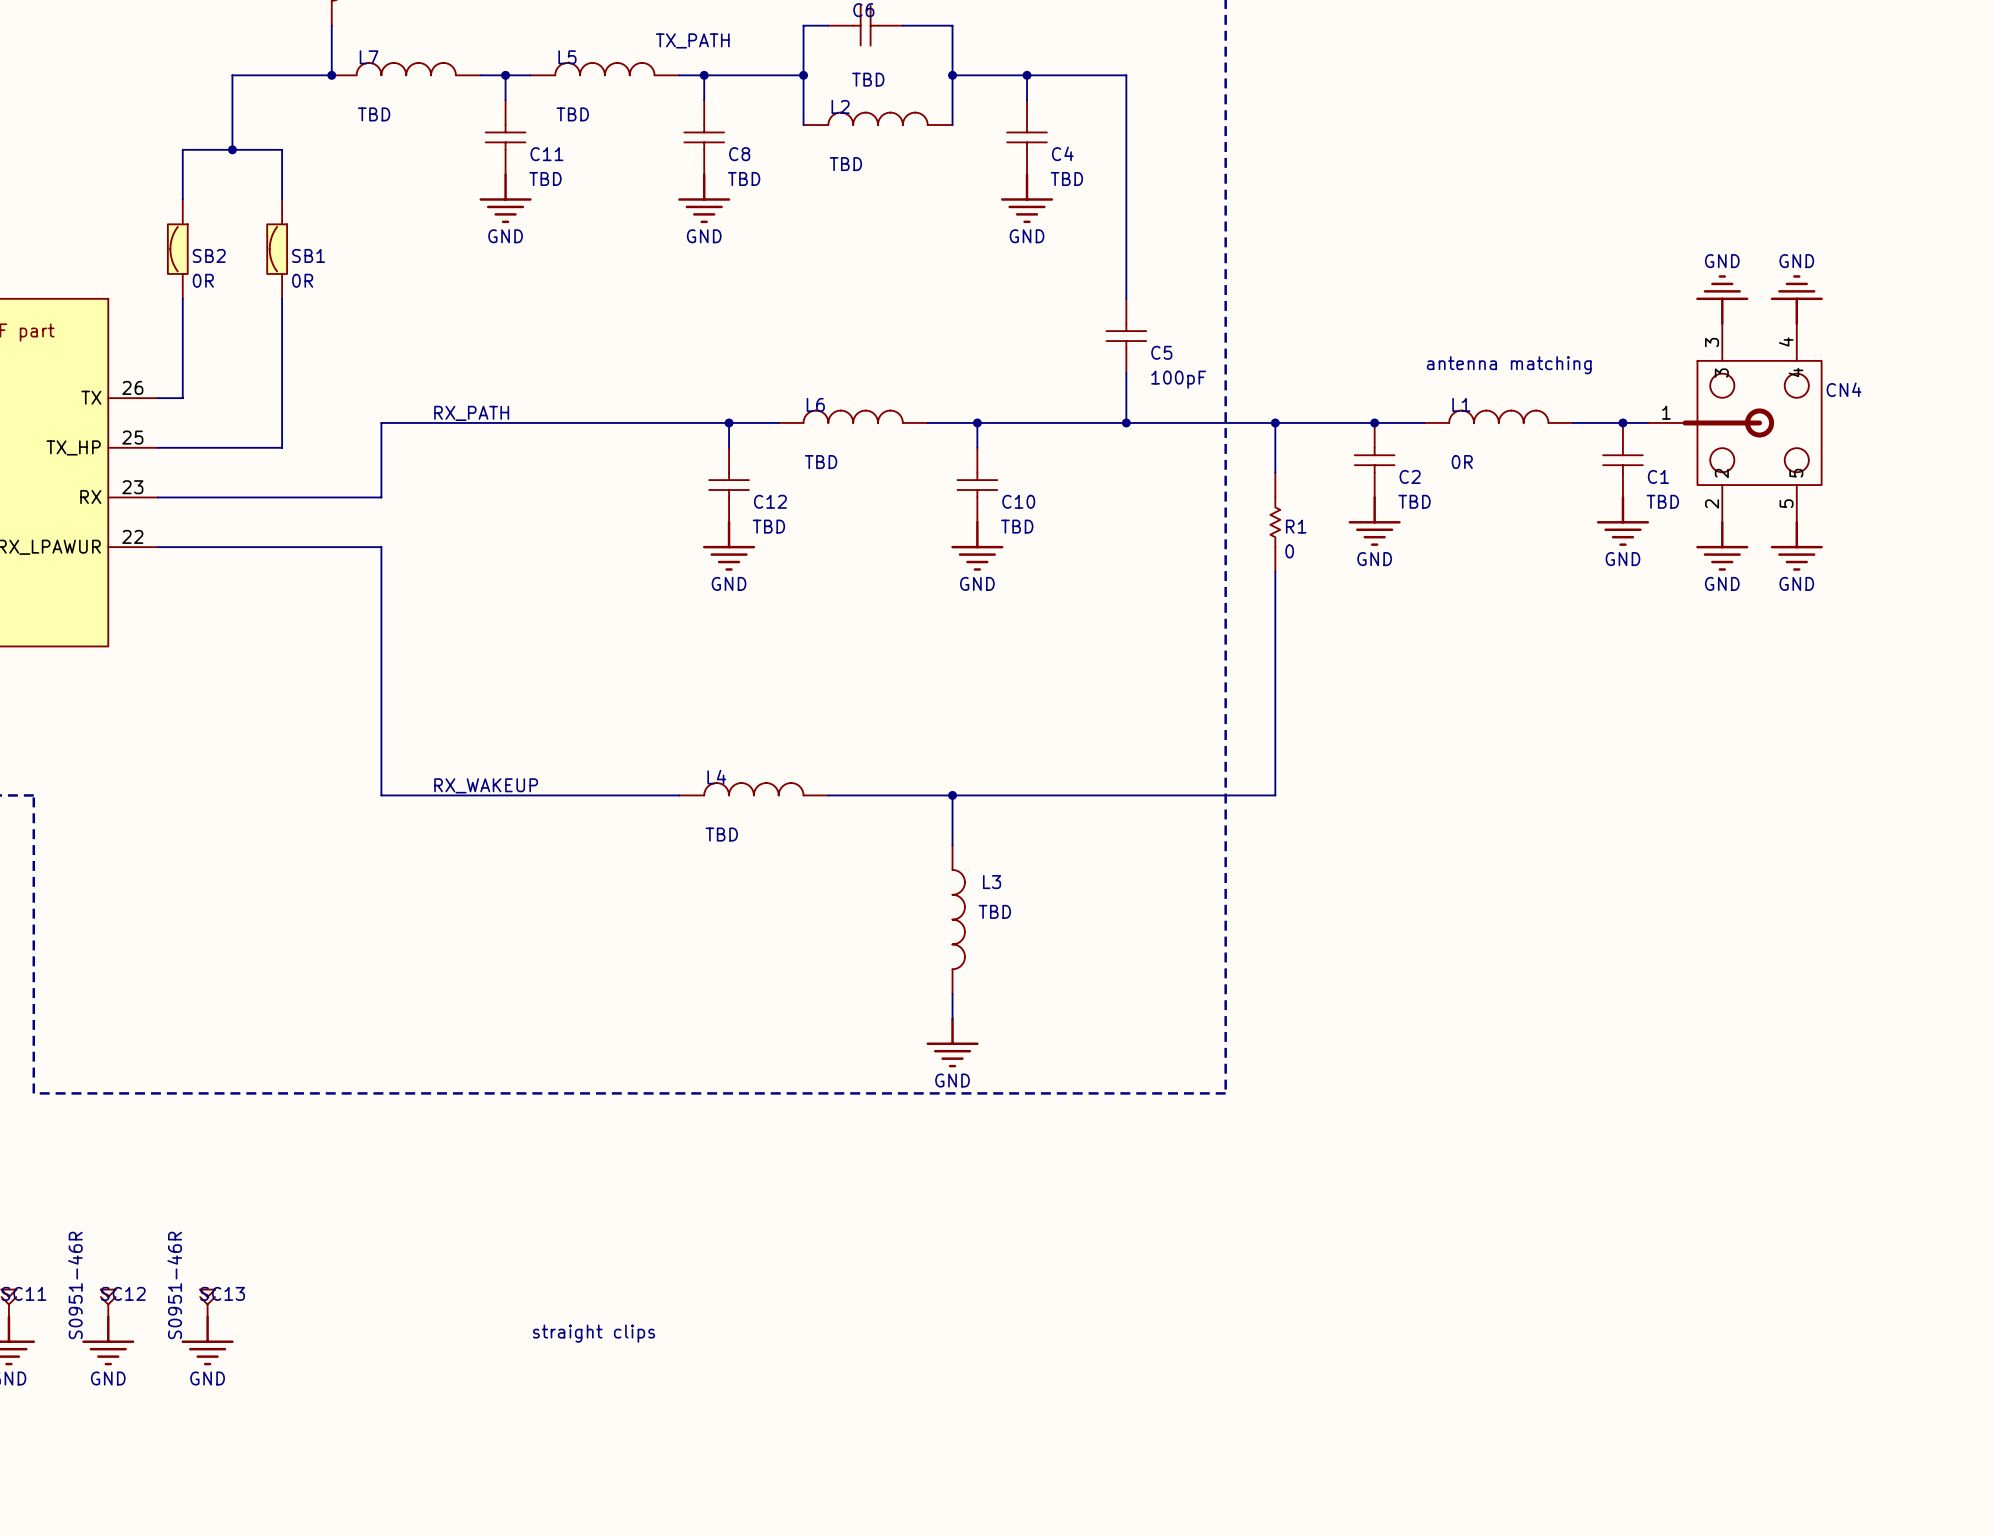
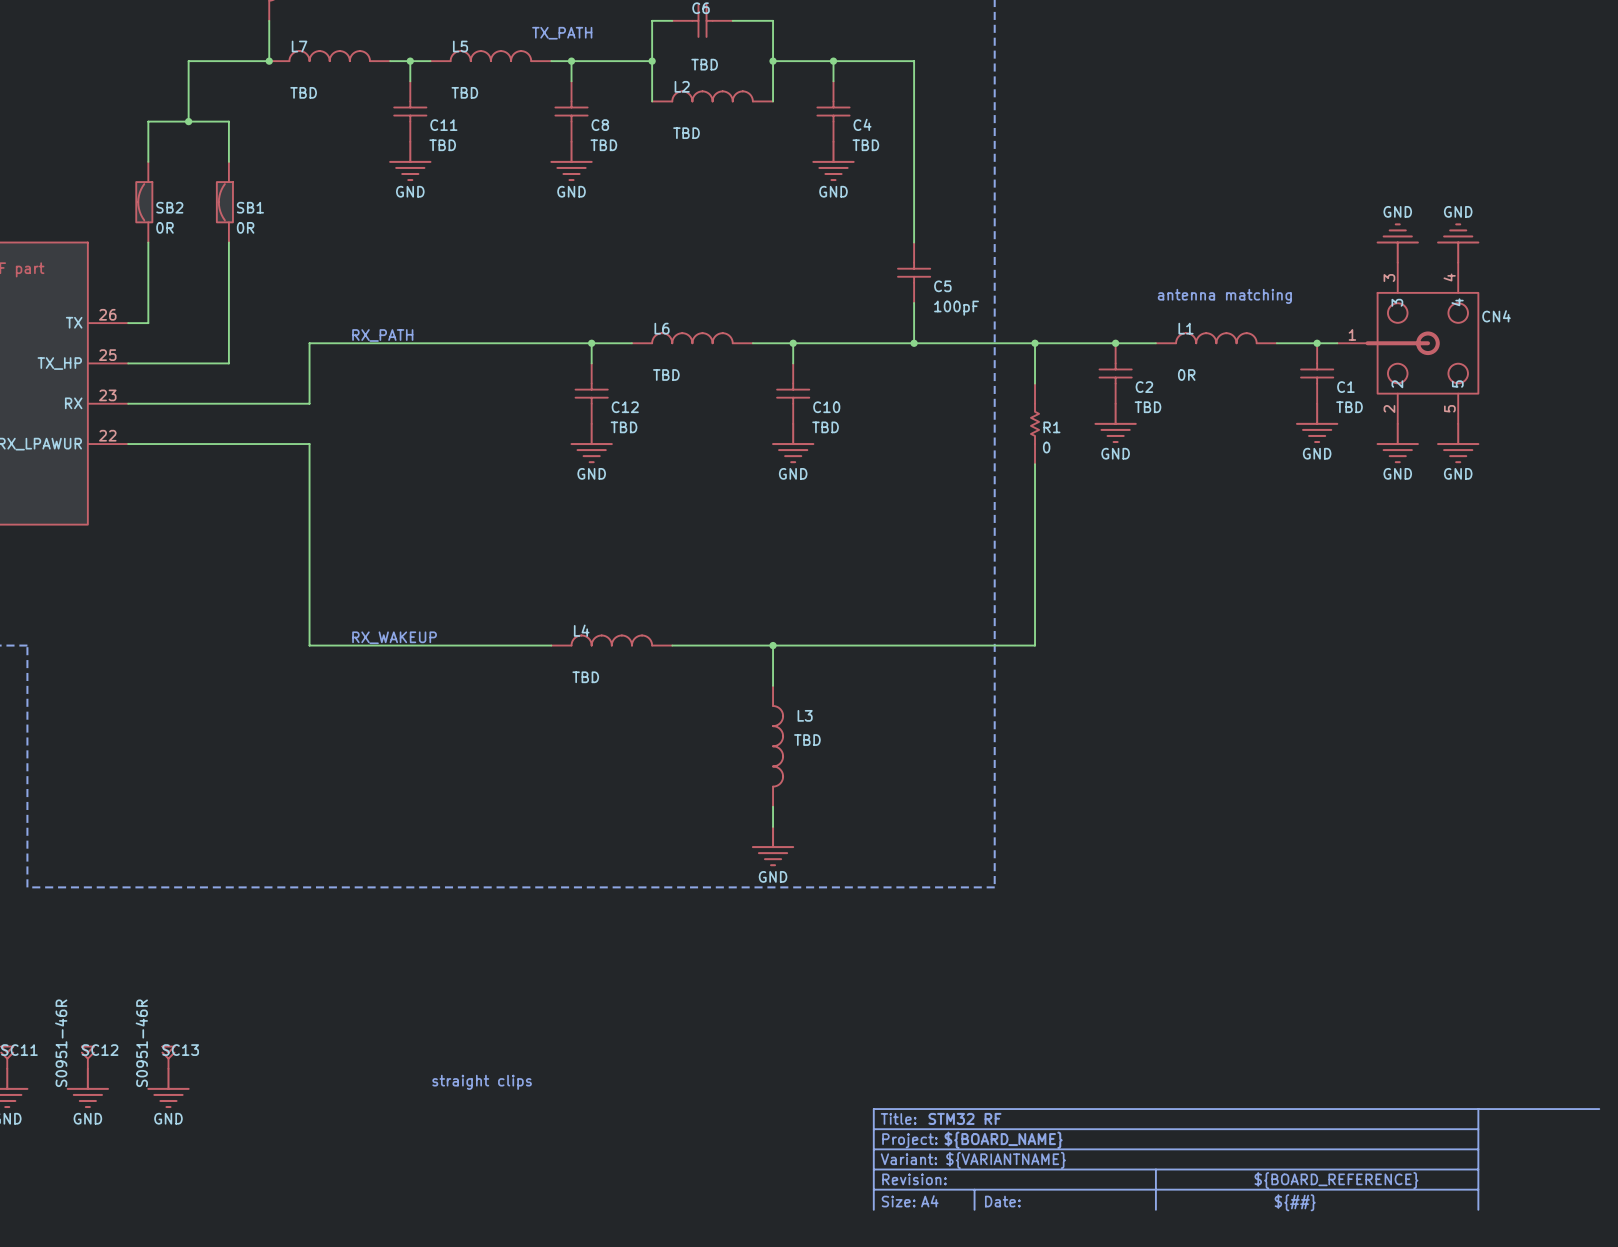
line: none -> (1478, 1109) (1478, 1209)
line: none -> (1599, 1109) (873, 1109) (873, 1209)
text: none -> Title: (898, 1118)
text: none -> STM32 RF (964, 1118)
line: none -> (873, 1129) (1478, 1129)
text: none -> Project: (909, 1140)
text: none -> ${BOARD_NAME} (1003, 1140)
line: none -> (873, 1149) (1478, 1149)
text: none -> Variant: (908, 1159)
text: none -> ${VARIANTNAME} (1006, 1160)
line: none -> (873, 1169) (1478, 1169)
line: none -> (1155, 1169) (1155, 1209)
text: none -> Revision: (914, 1179)
text: none -> ${BOARD_REFERENCE} (1336, 1180)
line: none -> (873, 1189) (1478, 1189)
line: none -> (974, 1189) (974, 1209)
text: none -> Size: (898, 1201)
text: none -> A4 (929, 1201)
text: none -> Date: (1002, 1201)
text: none -> ${##} (1295, 1202)

